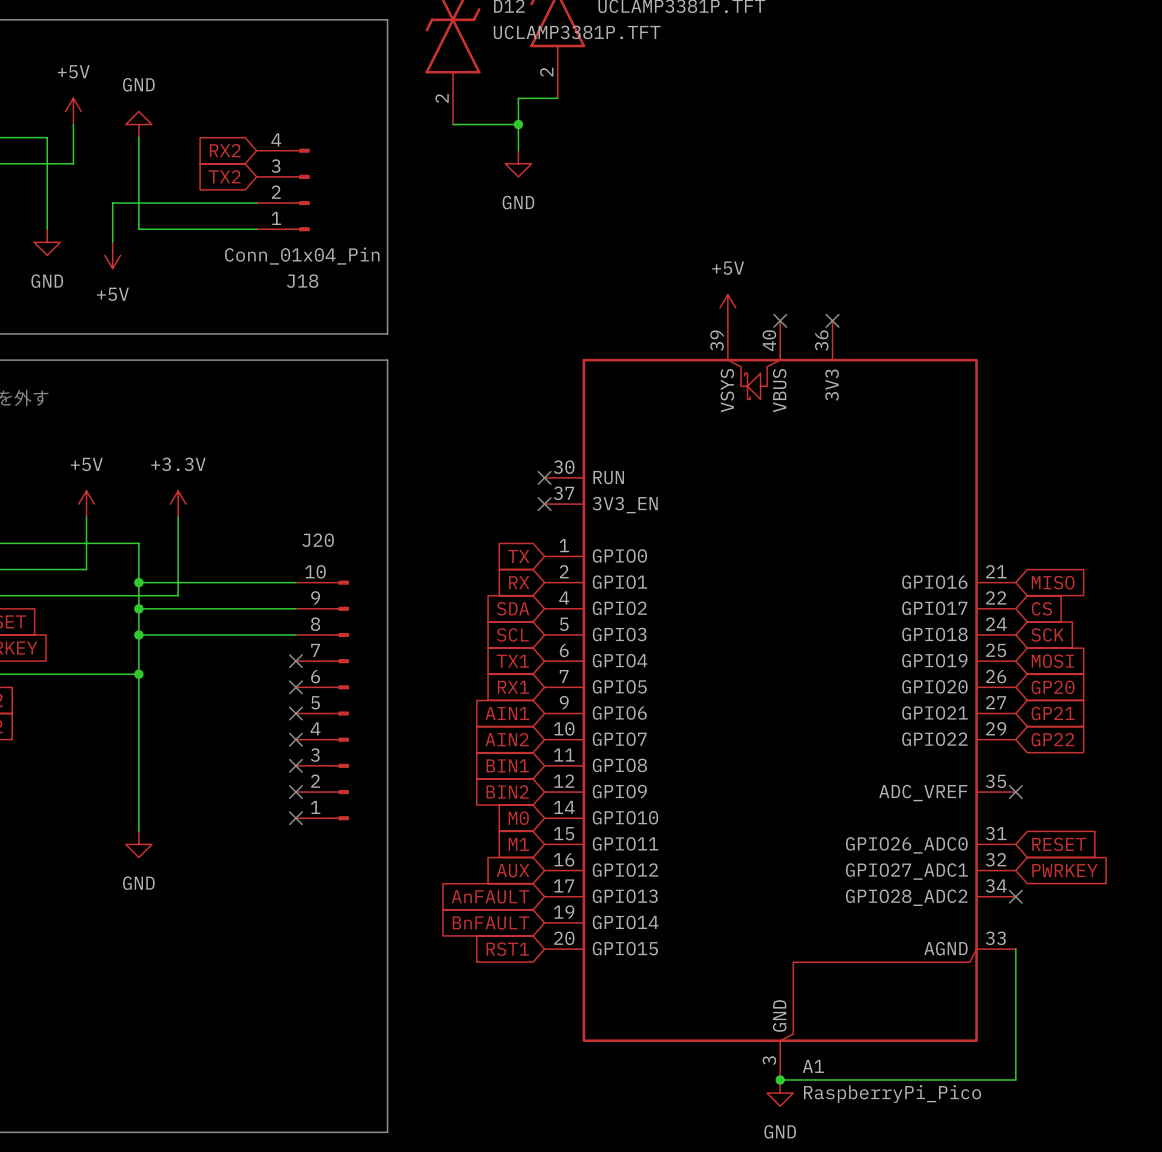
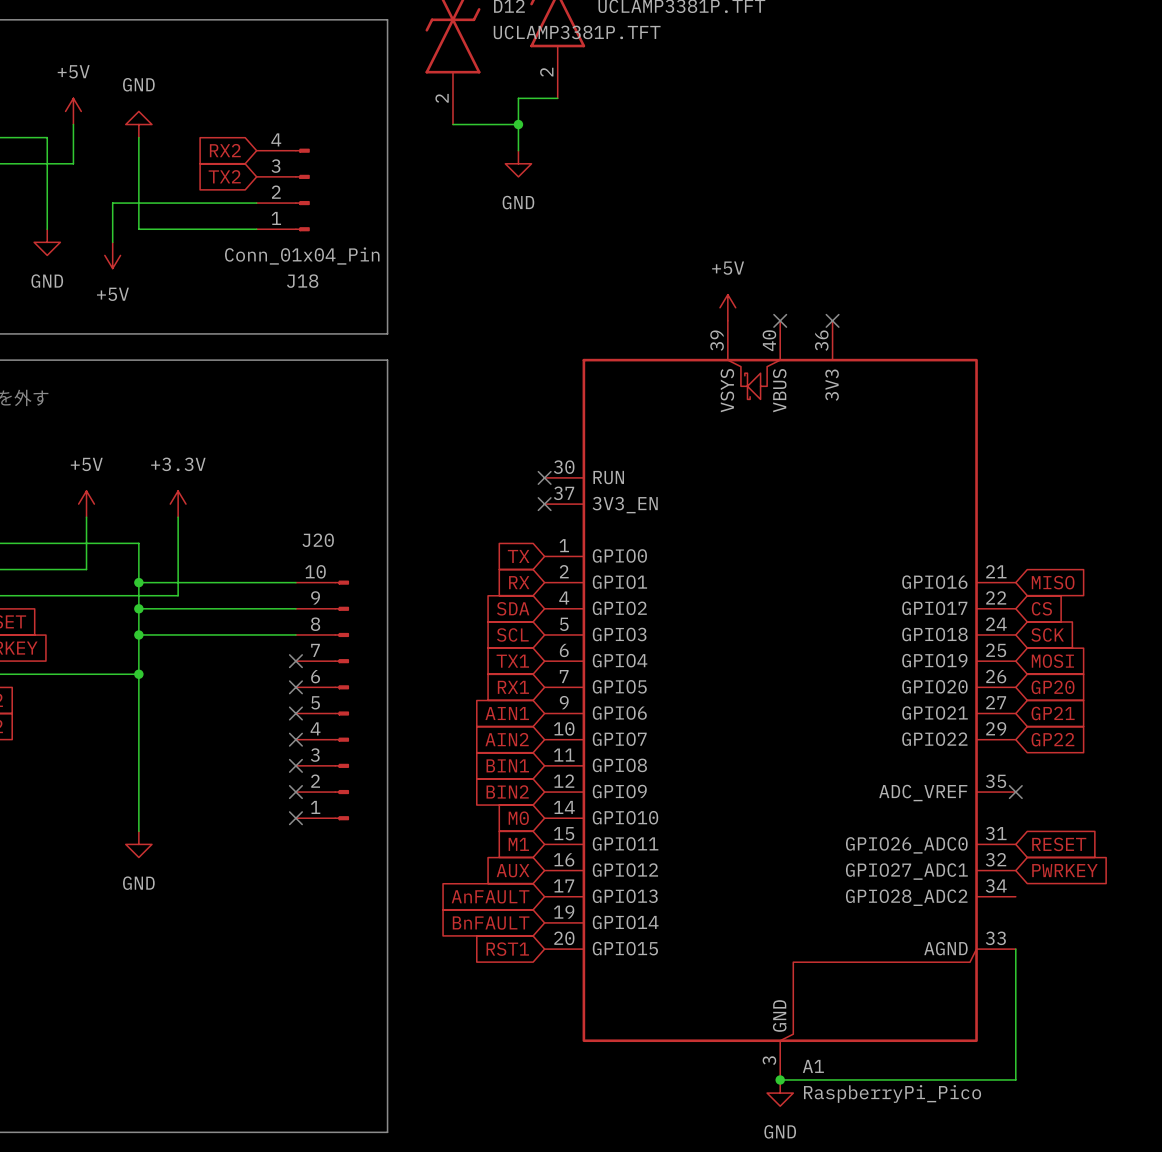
no-connect mark: (1015, 896) -> none

